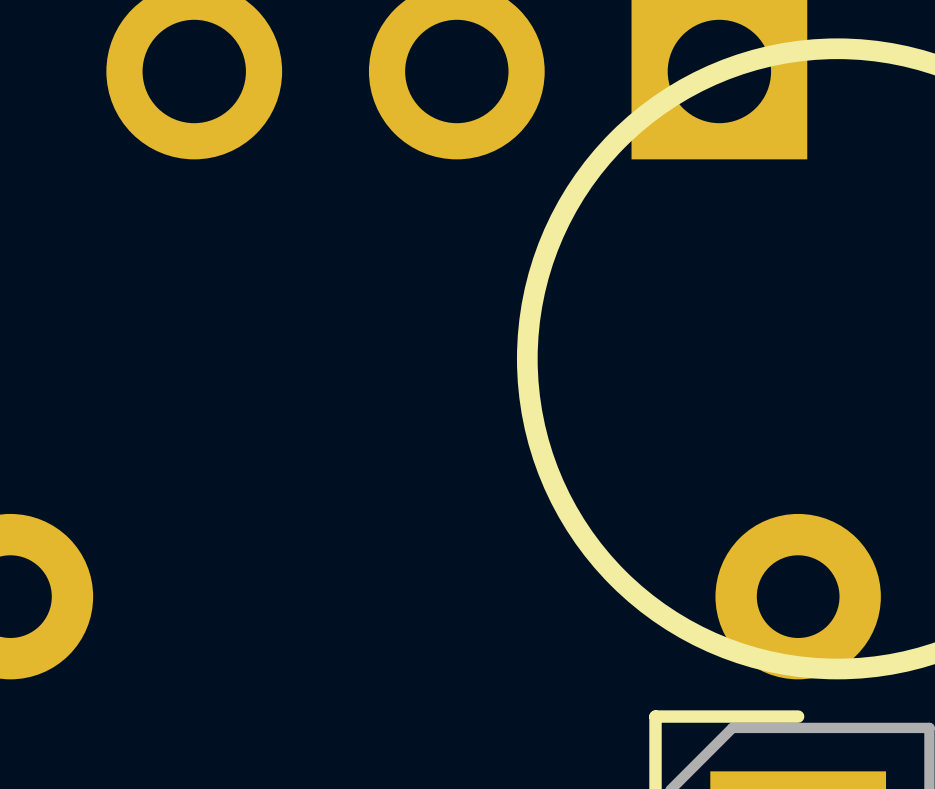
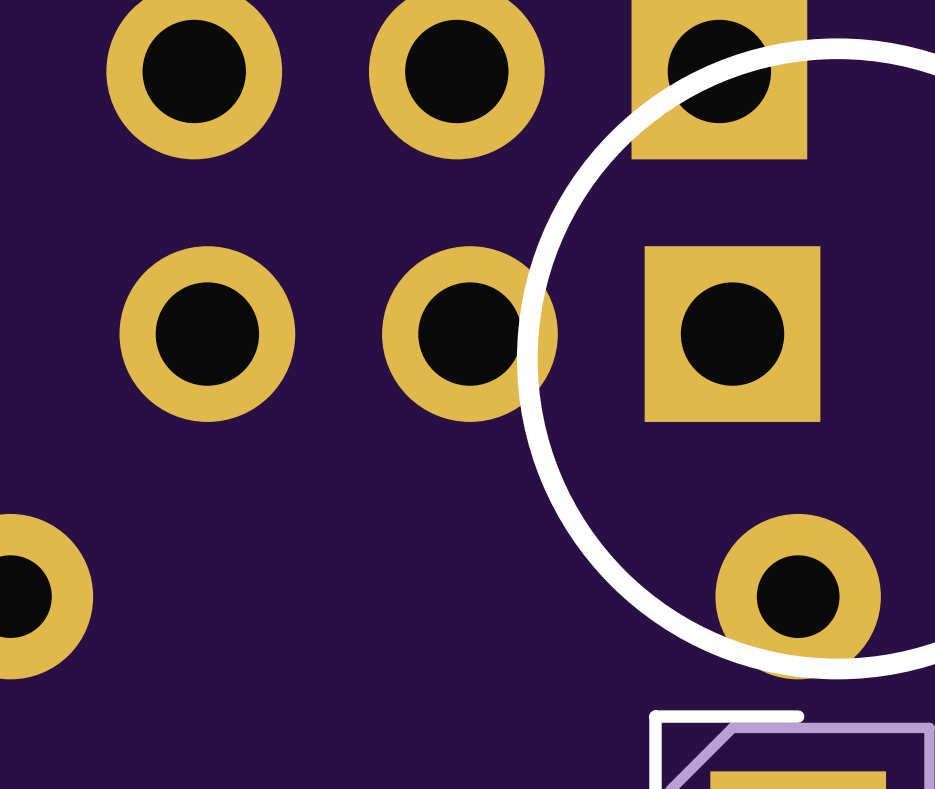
part: none -> (469, 334)

